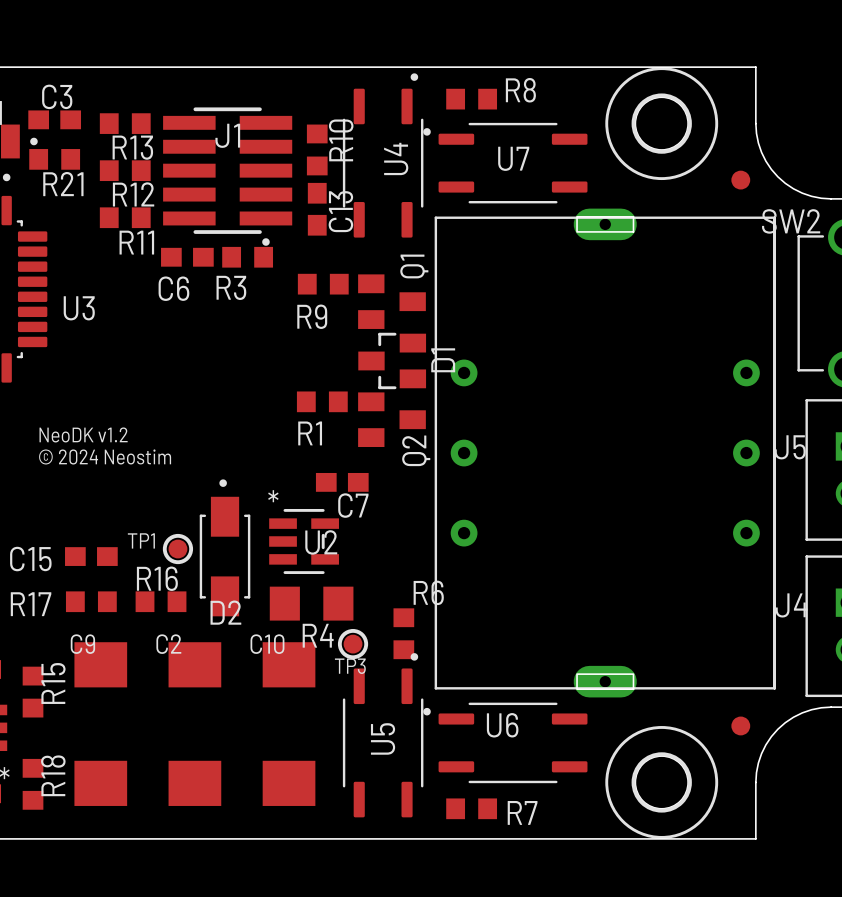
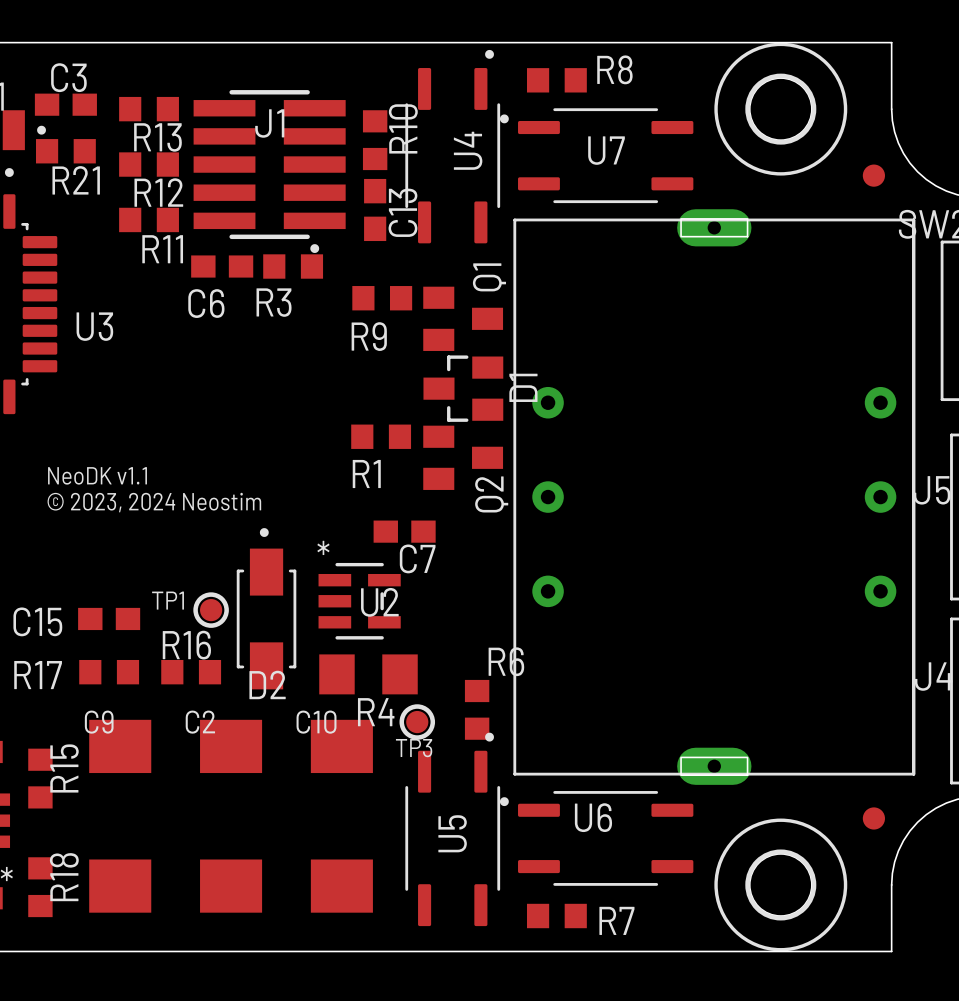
text: NeoDK v1.2 (83, 434) -> NeoDK v1.1 (97, 475)
text: © 2024 Neostim (105, 456) -> © 2023, 2024 Neostim (154, 502)

